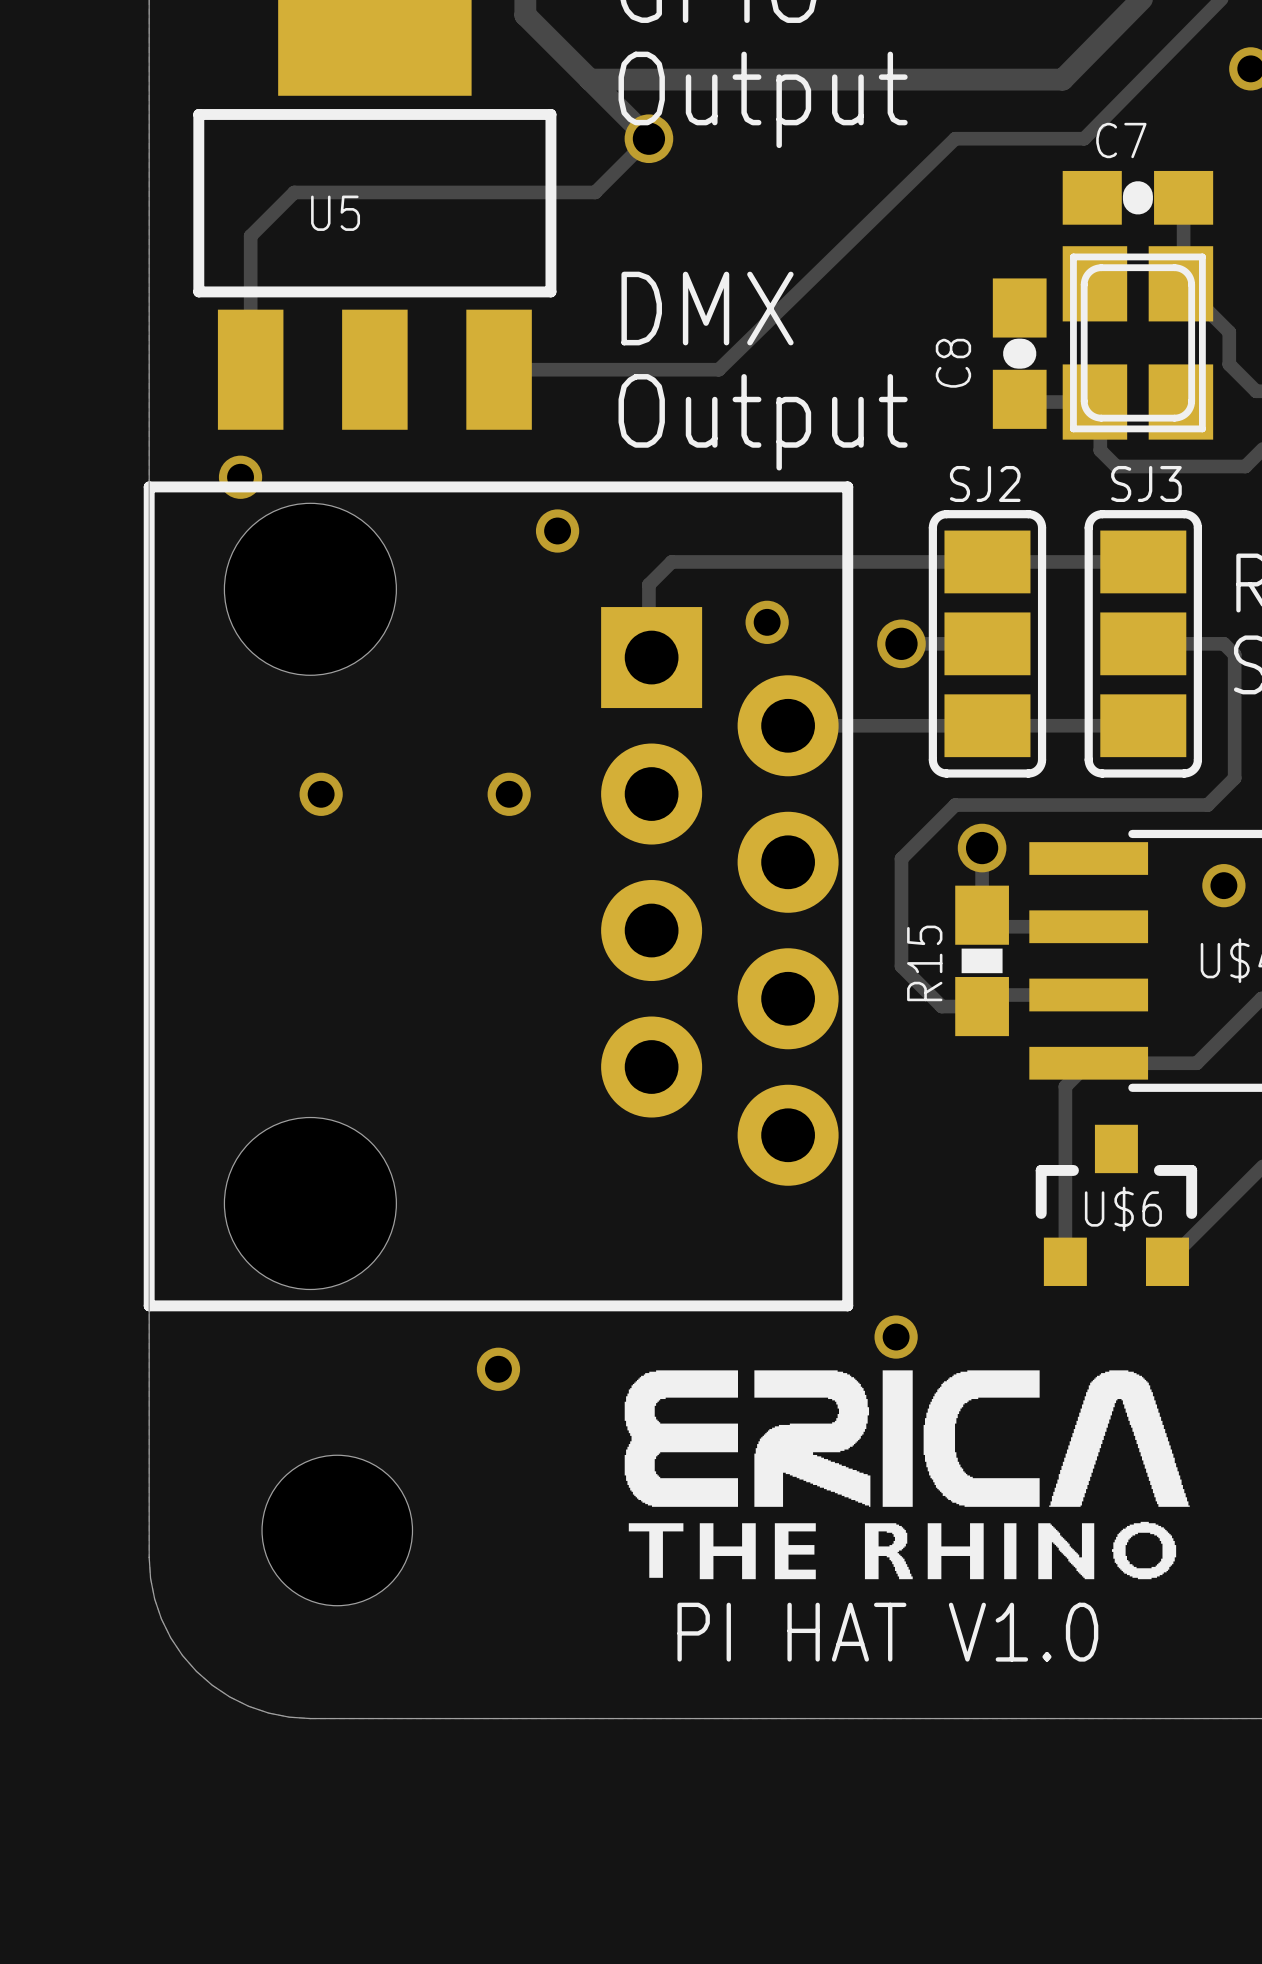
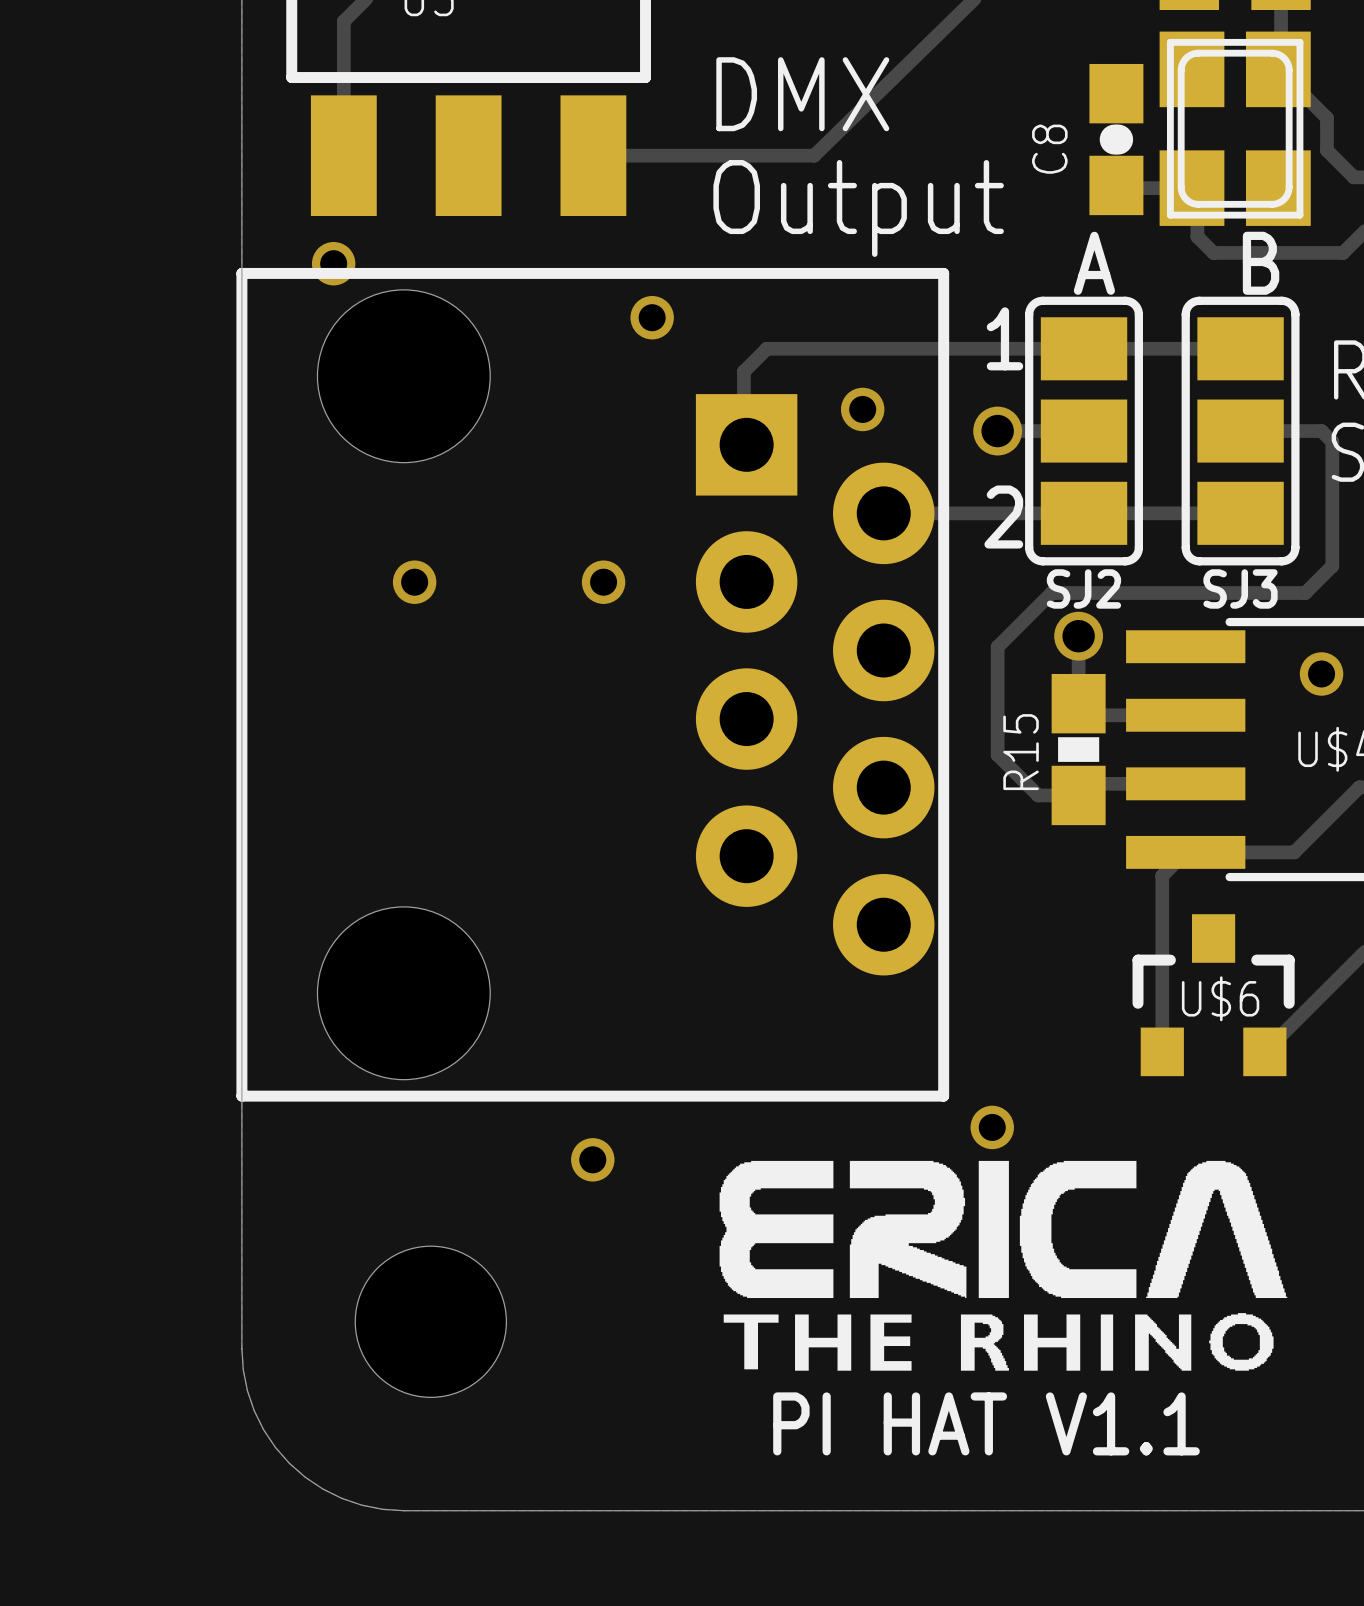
text: none -> A (1094, 263)
text: none -> B (1261, 263)
SJ2 name position: SJ2 (985, 483) -> SJ2 (1083, 588)
SJ3 name position: SJ3 (1146, 483) -> SJ3 (1240, 588)
text: none -> 1 (1004, 338)
text: none -> 2 (1003, 517)
text: PI HAT V1.0 (887, 1632) -> PI HAT V1.1 (986, 1423)

